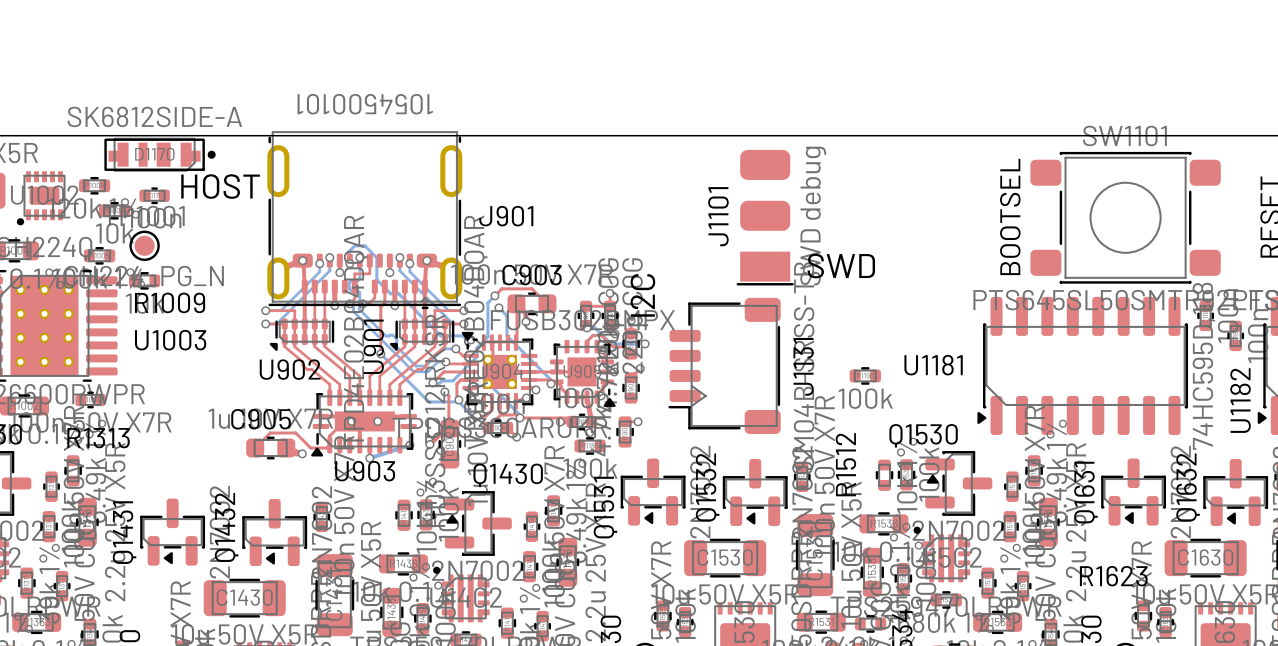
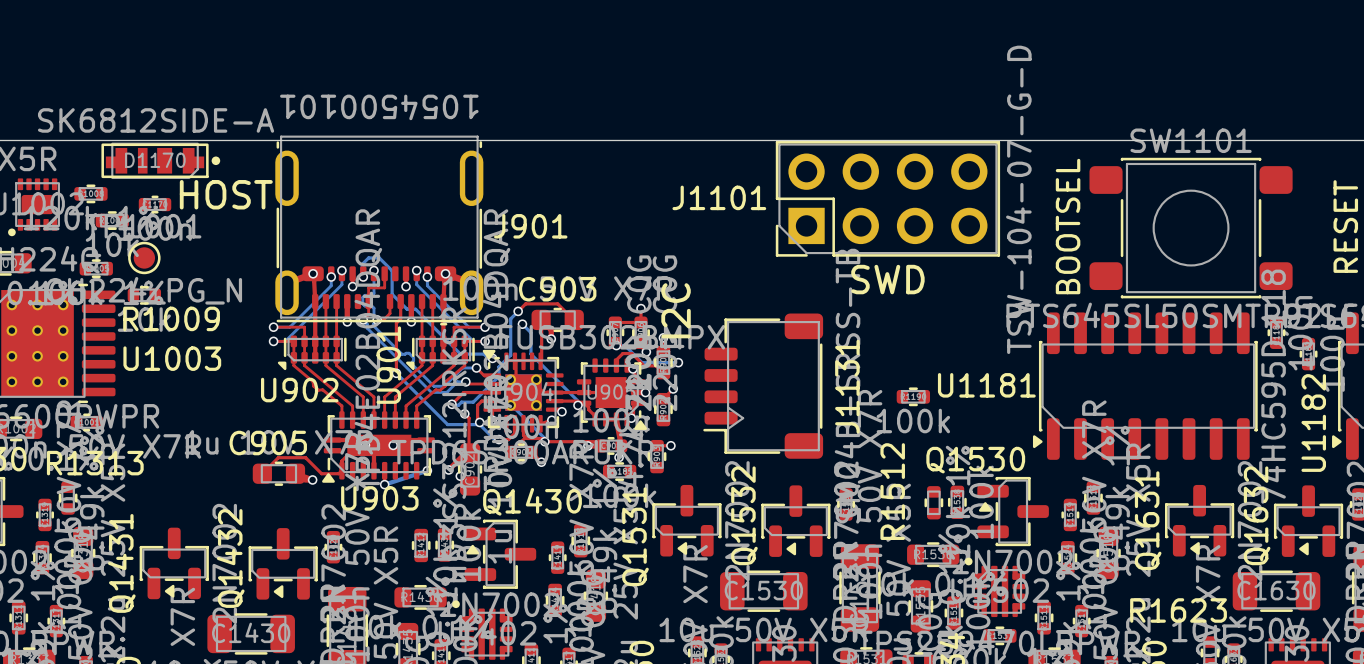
J1101 footprint: [736, 149, 794, 286] -> [775, 140, 1001, 257]
J1101 name position: J1101 (718, 216) -> J1101 (719, 197)
J1101 value: SWD debug (813, 216) -> TSW-104-07-G-D (1018, 199)

